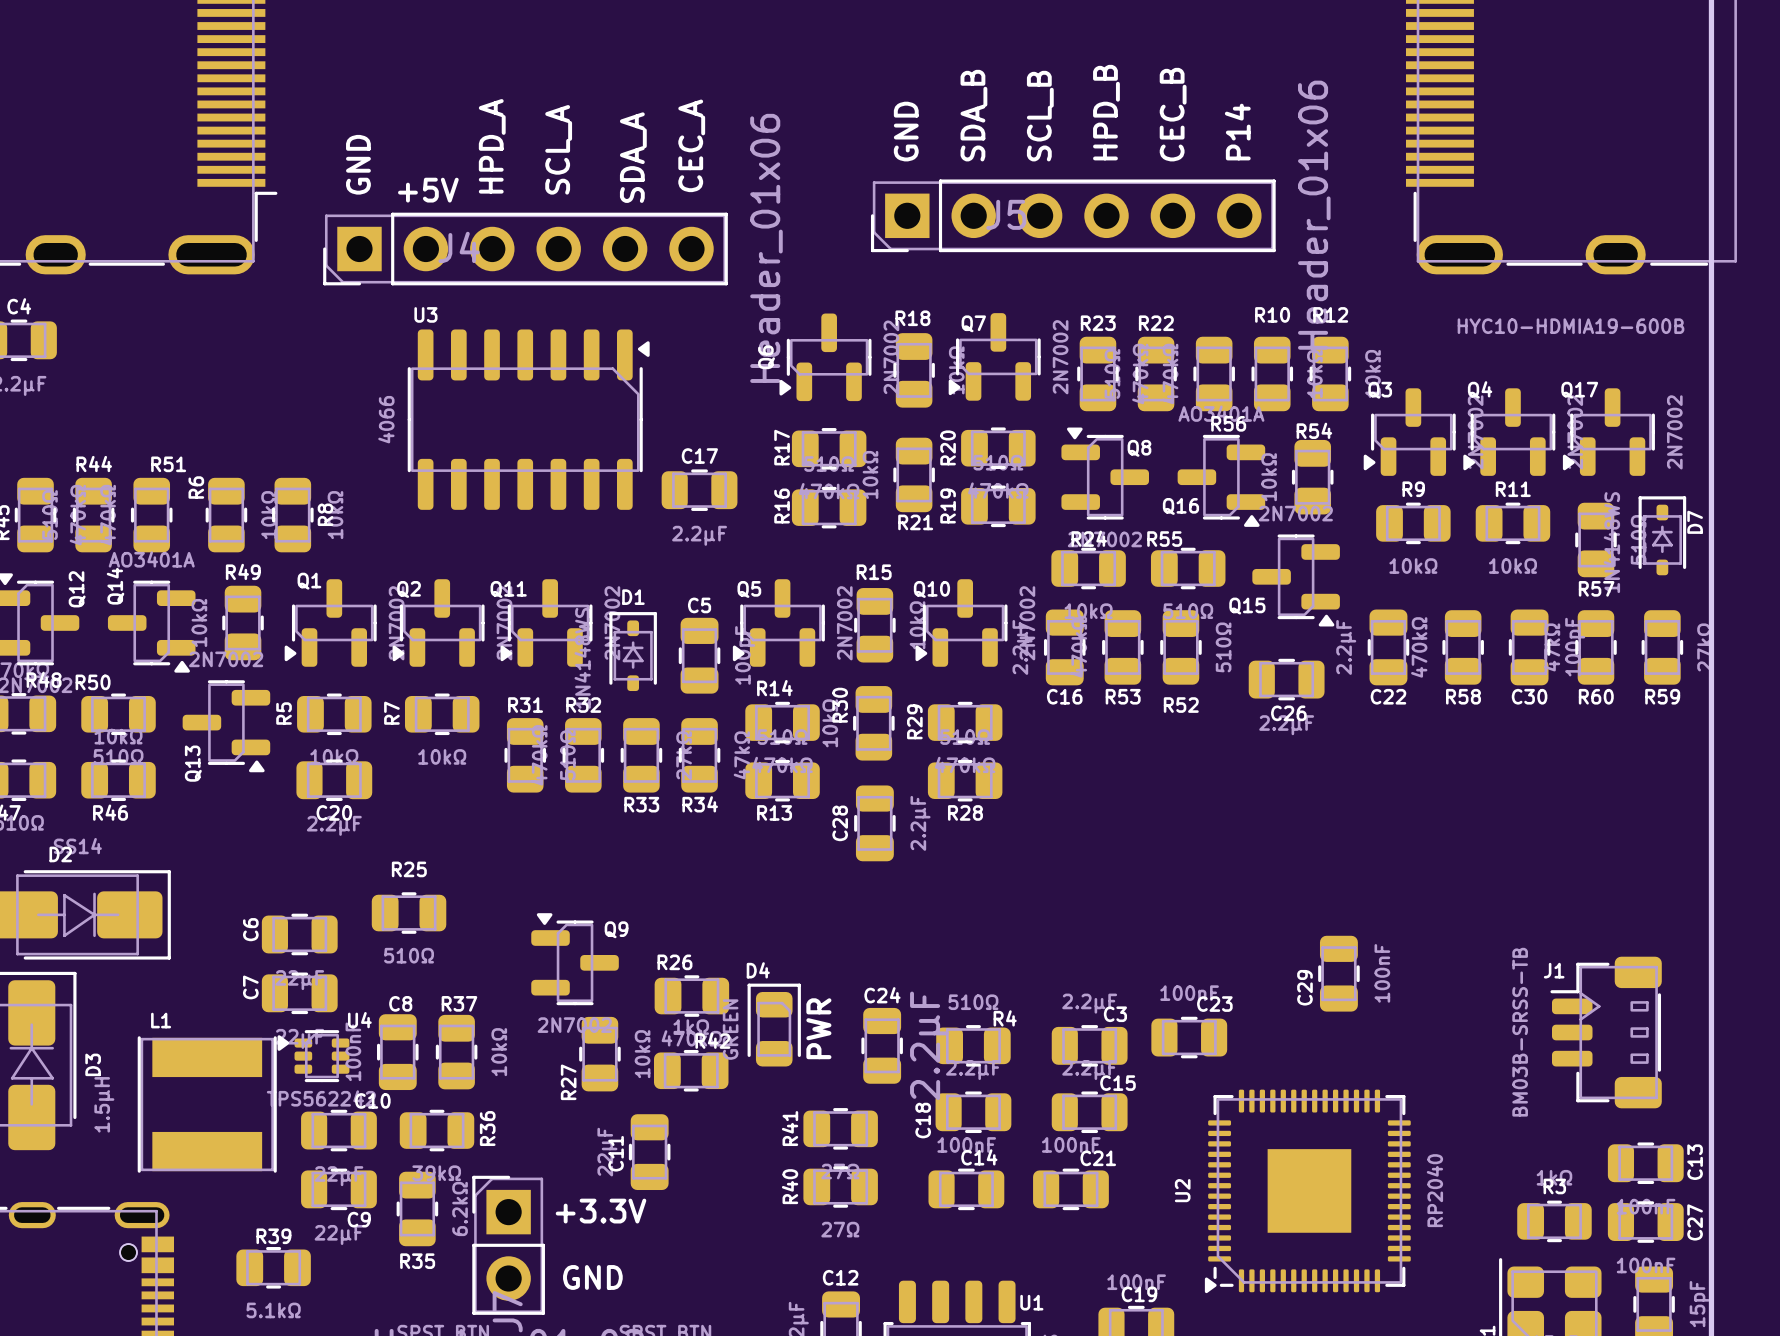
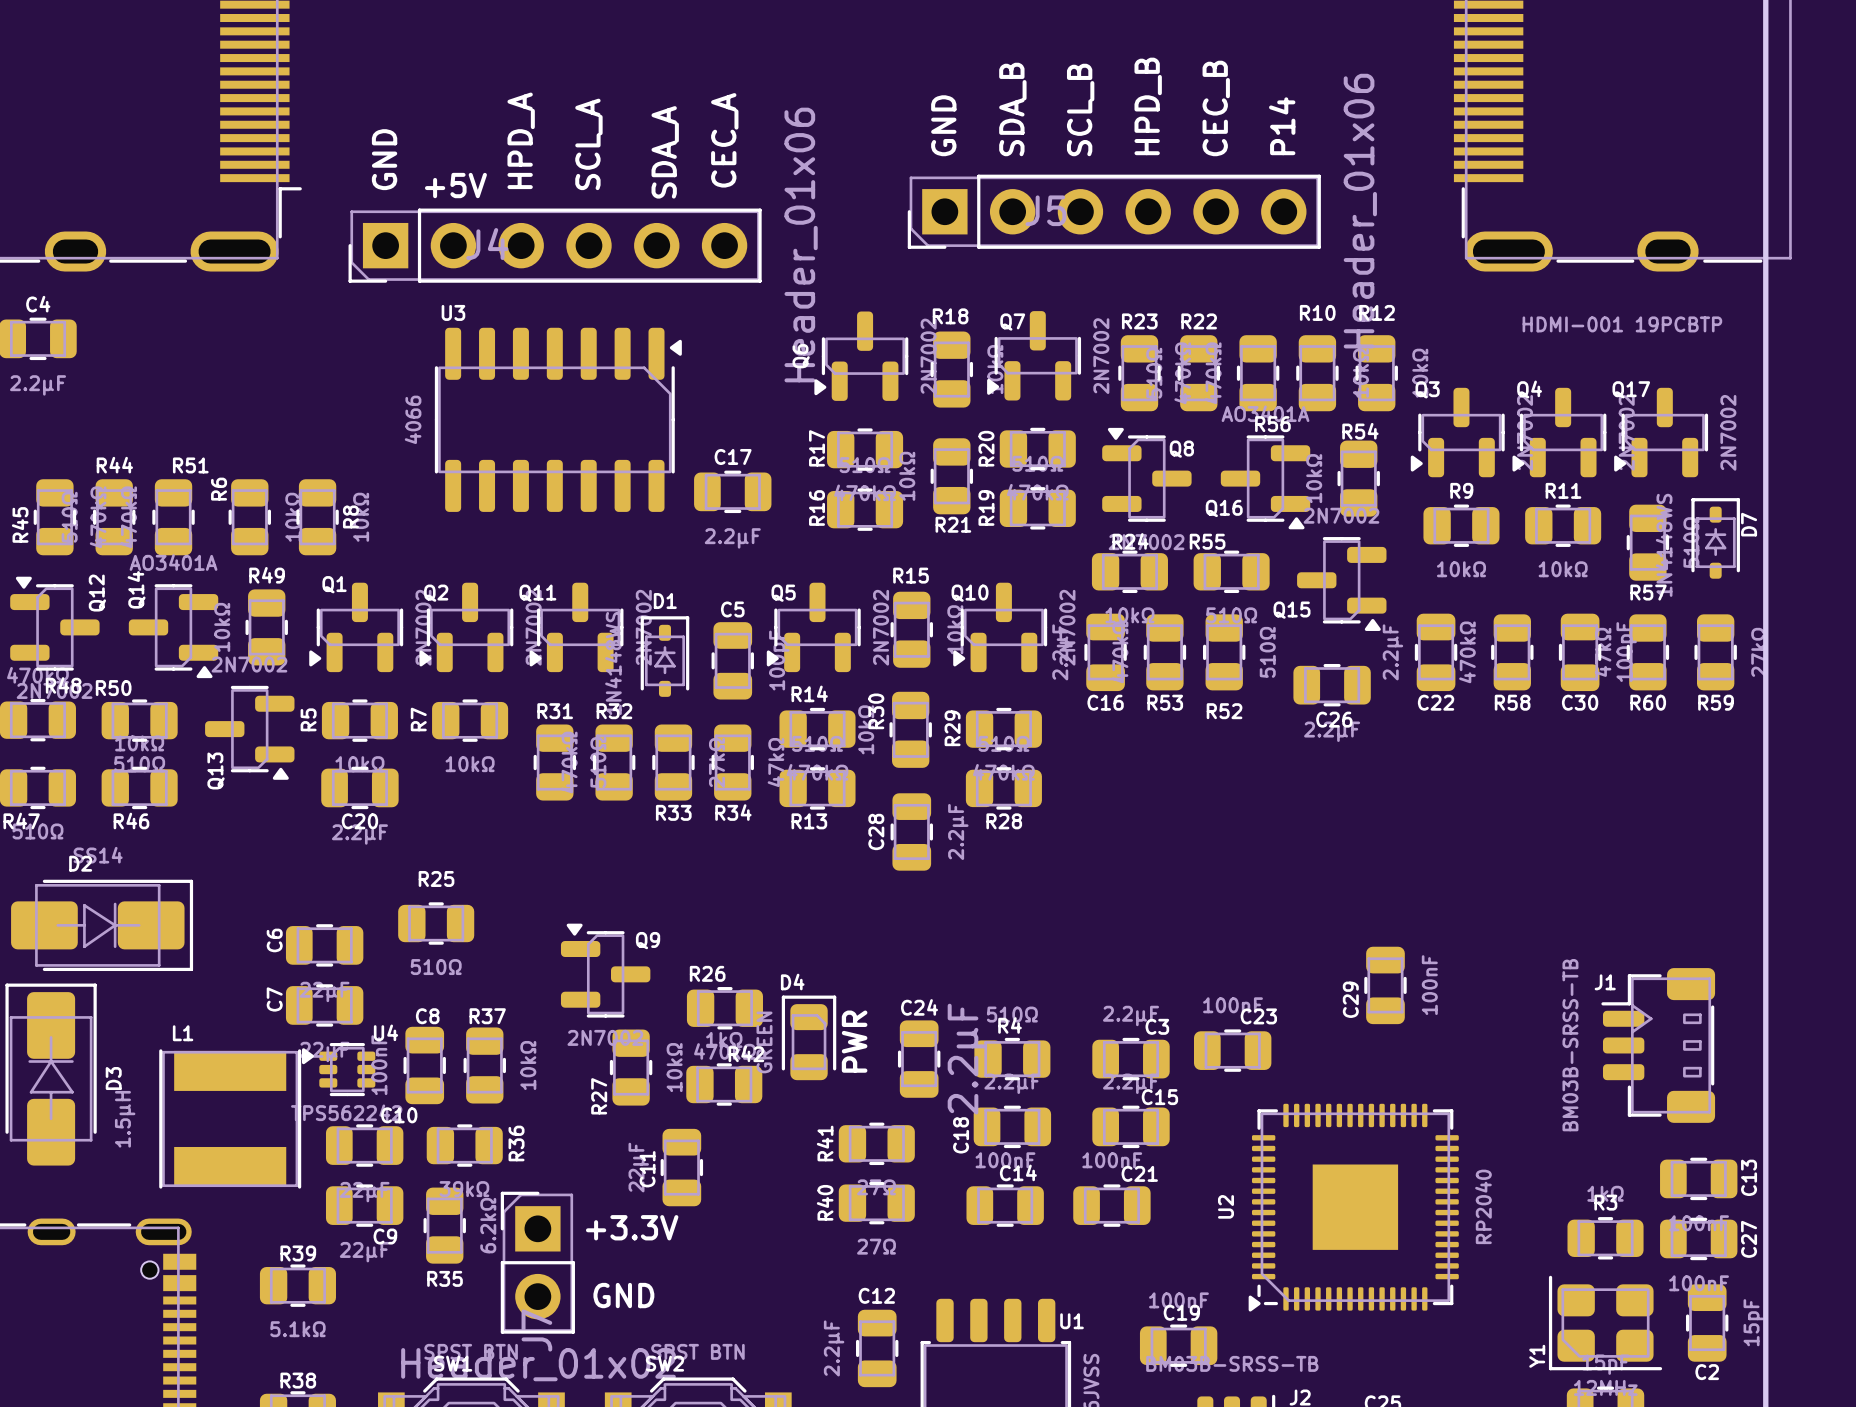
part value: HYC10-HDMIA19-600B (1570, 326) -> HDMI-001 19PCBTP (1622, 324)
R4 name position: R4 (1005, 1018) -> R4 (1010, 1025)

